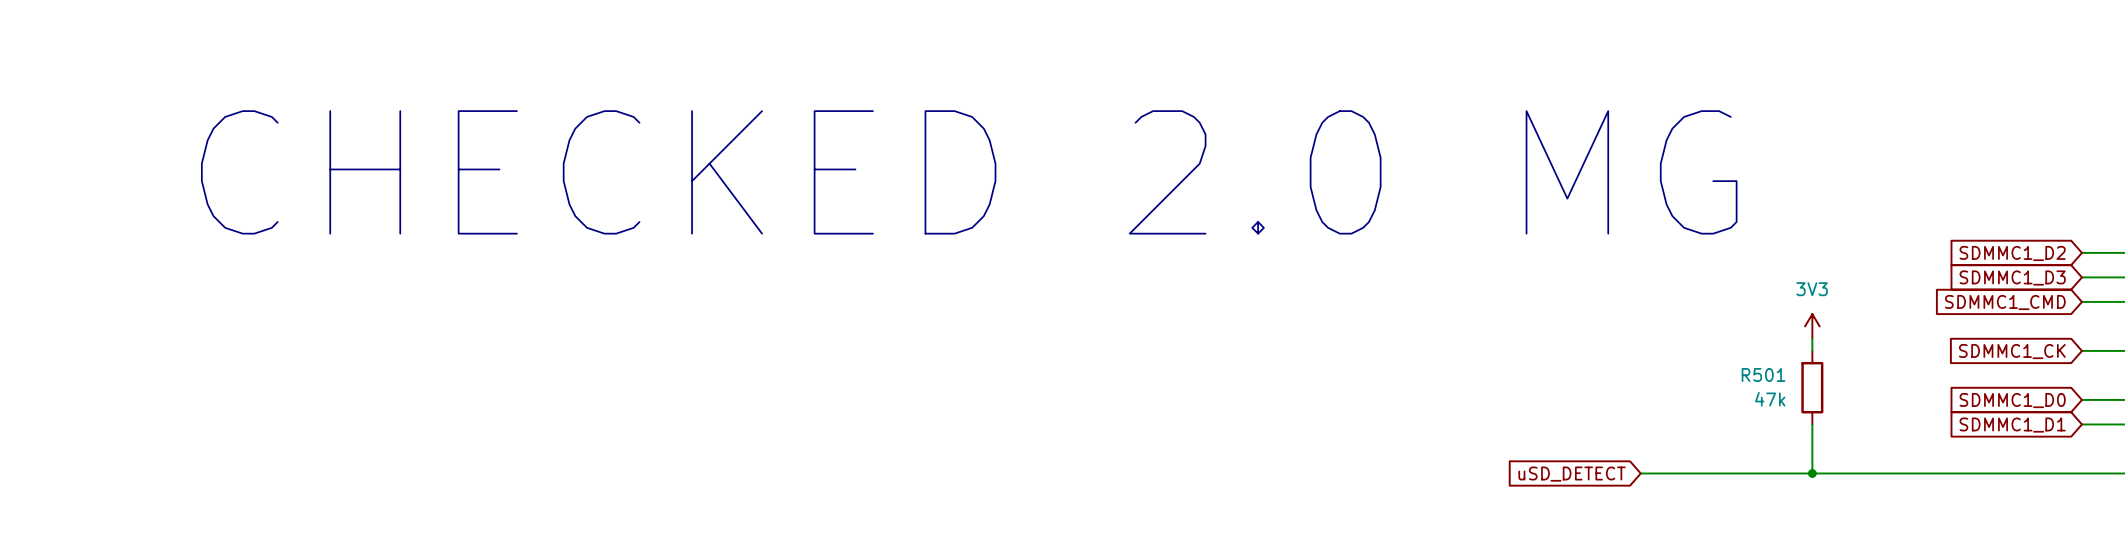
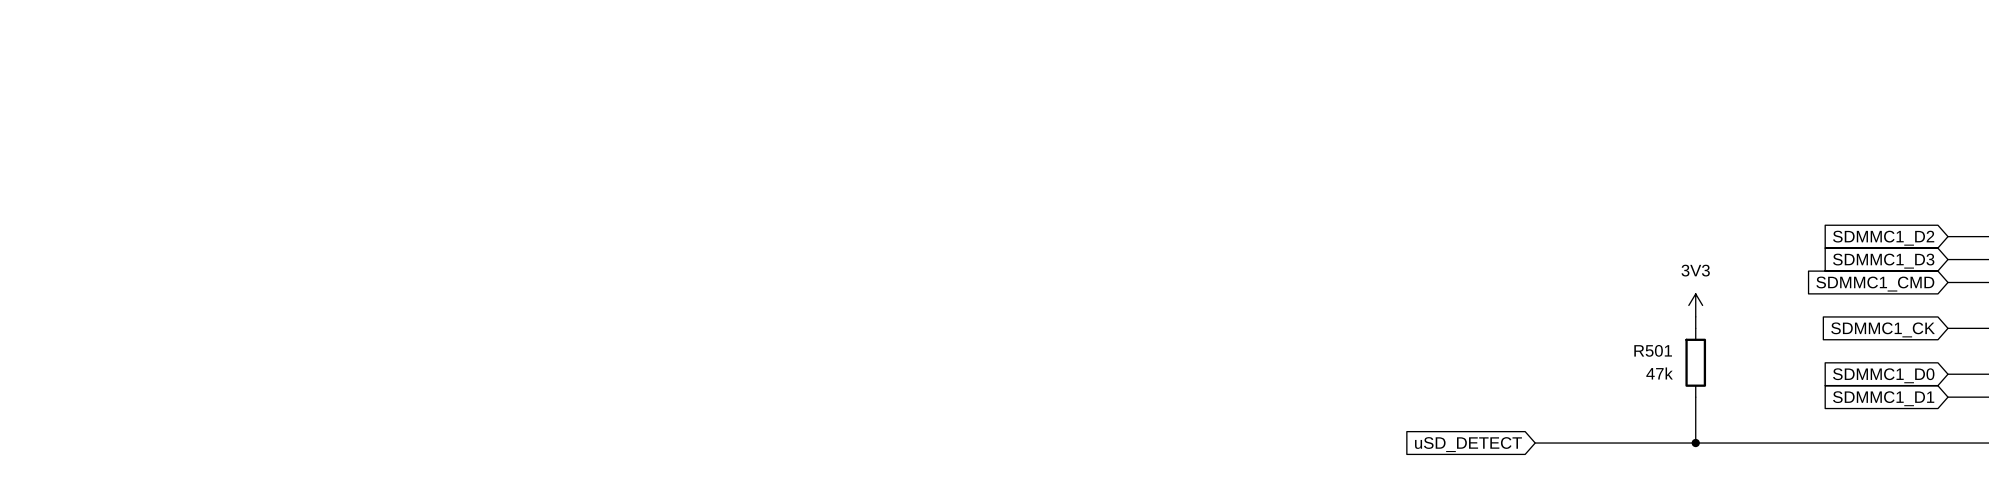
text: CHECKED 2.0 MG (969, 172) -> none

